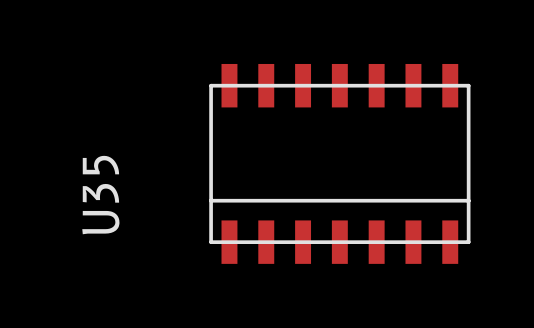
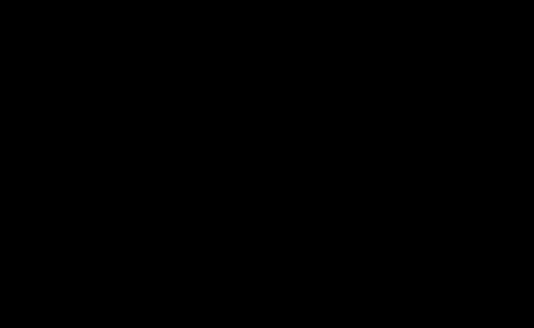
U35: (339, 163) -> none

